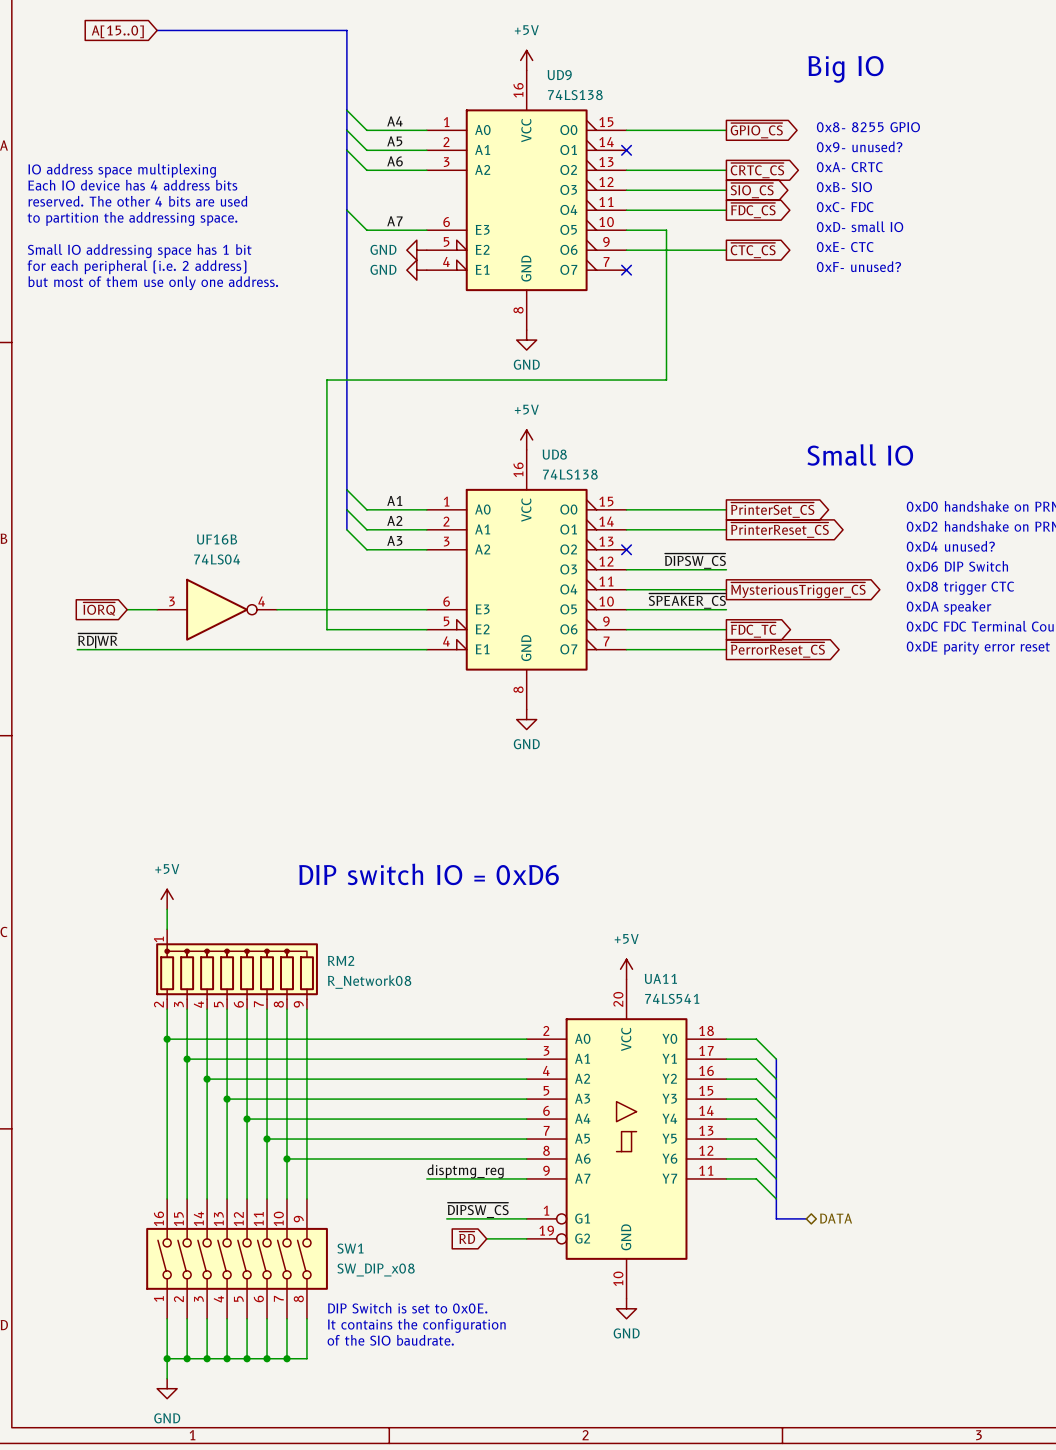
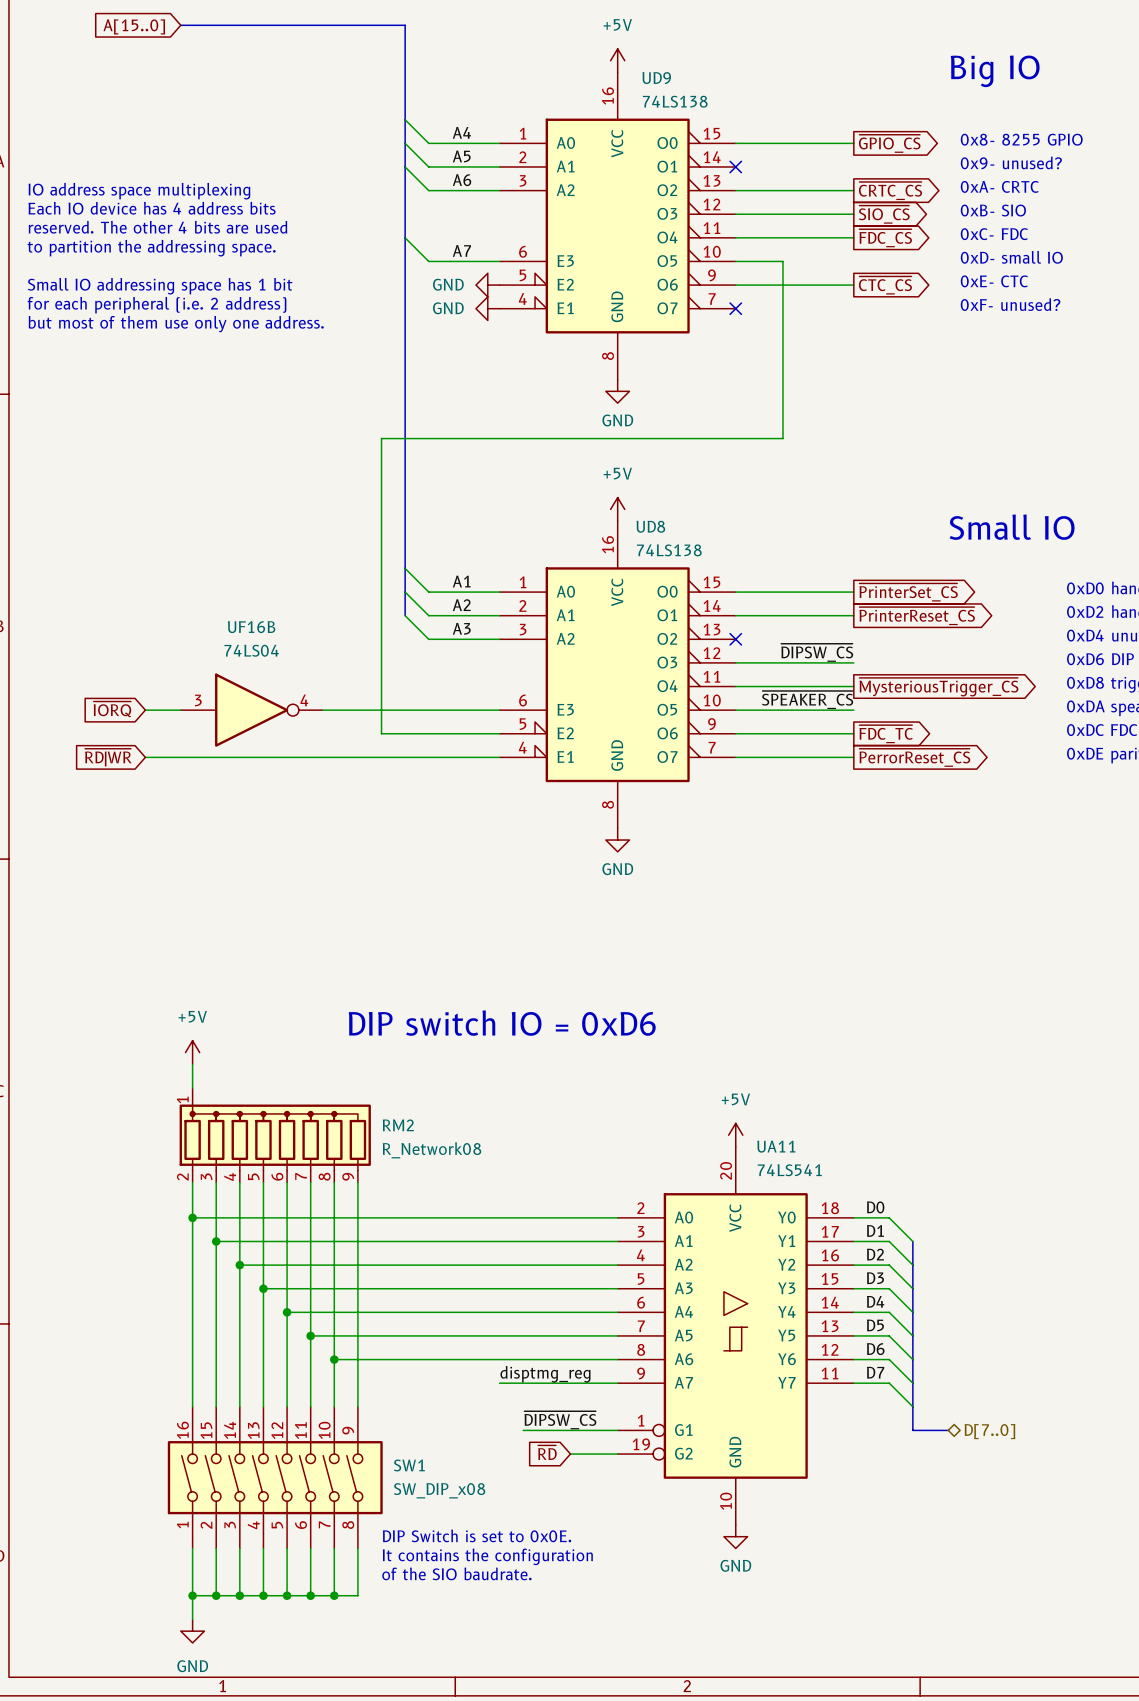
label: ~{RD|WR} (97, 640) -> none
wire: (77, 649) (127, 649) -> none
global label: none -> ~{RD|WR} (108, 757)
label: none -> D0 (875, 1207)
label: none -> D1 (875, 1230)
label: none -> D2 (875, 1254)
label: none -> D3 (875, 1278)
label: none -> D4 (875, 1301)
label: none -> D5 (875, 1325)
label: none -> D6 (875, 1349)
label: none -> D7 (875, 1372)
hierarchical label: DATA (836, 1218) -> D[7..0] (989, 1431)

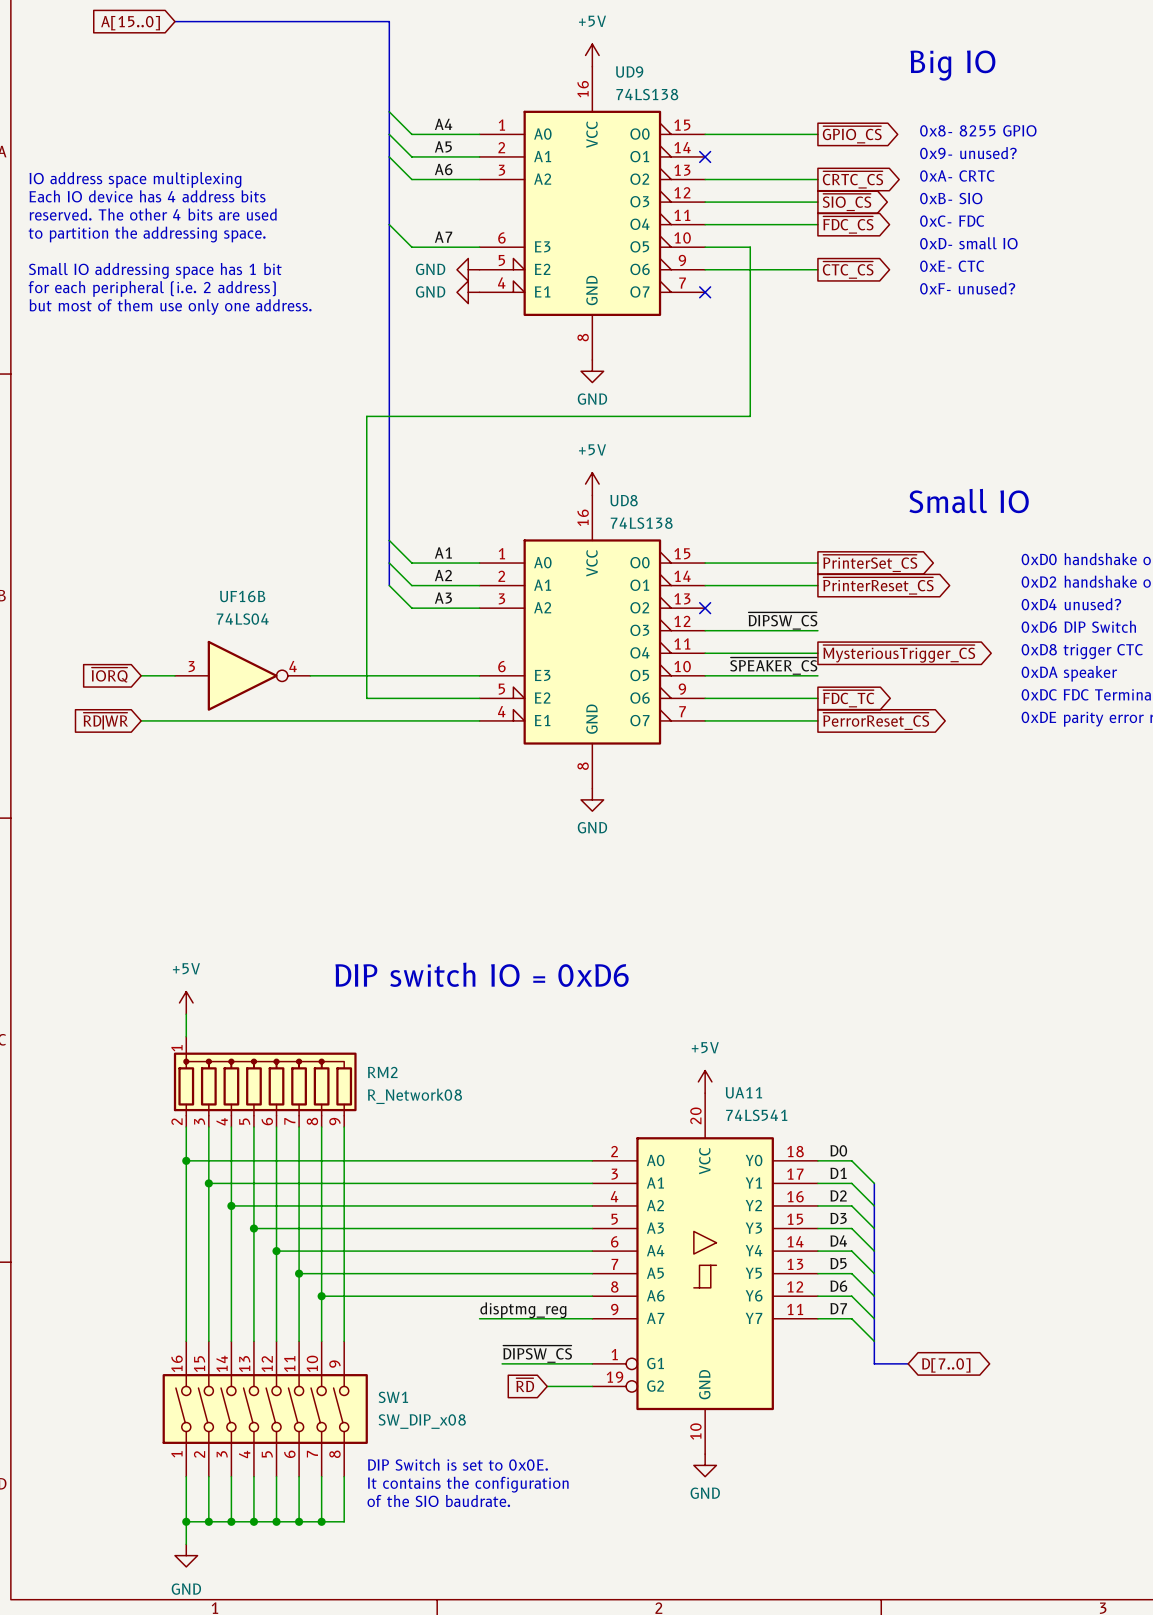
hierarchical label: D[7..0] (989, 1431) -> none
global label: none -> D[7..0] (946, 1365)

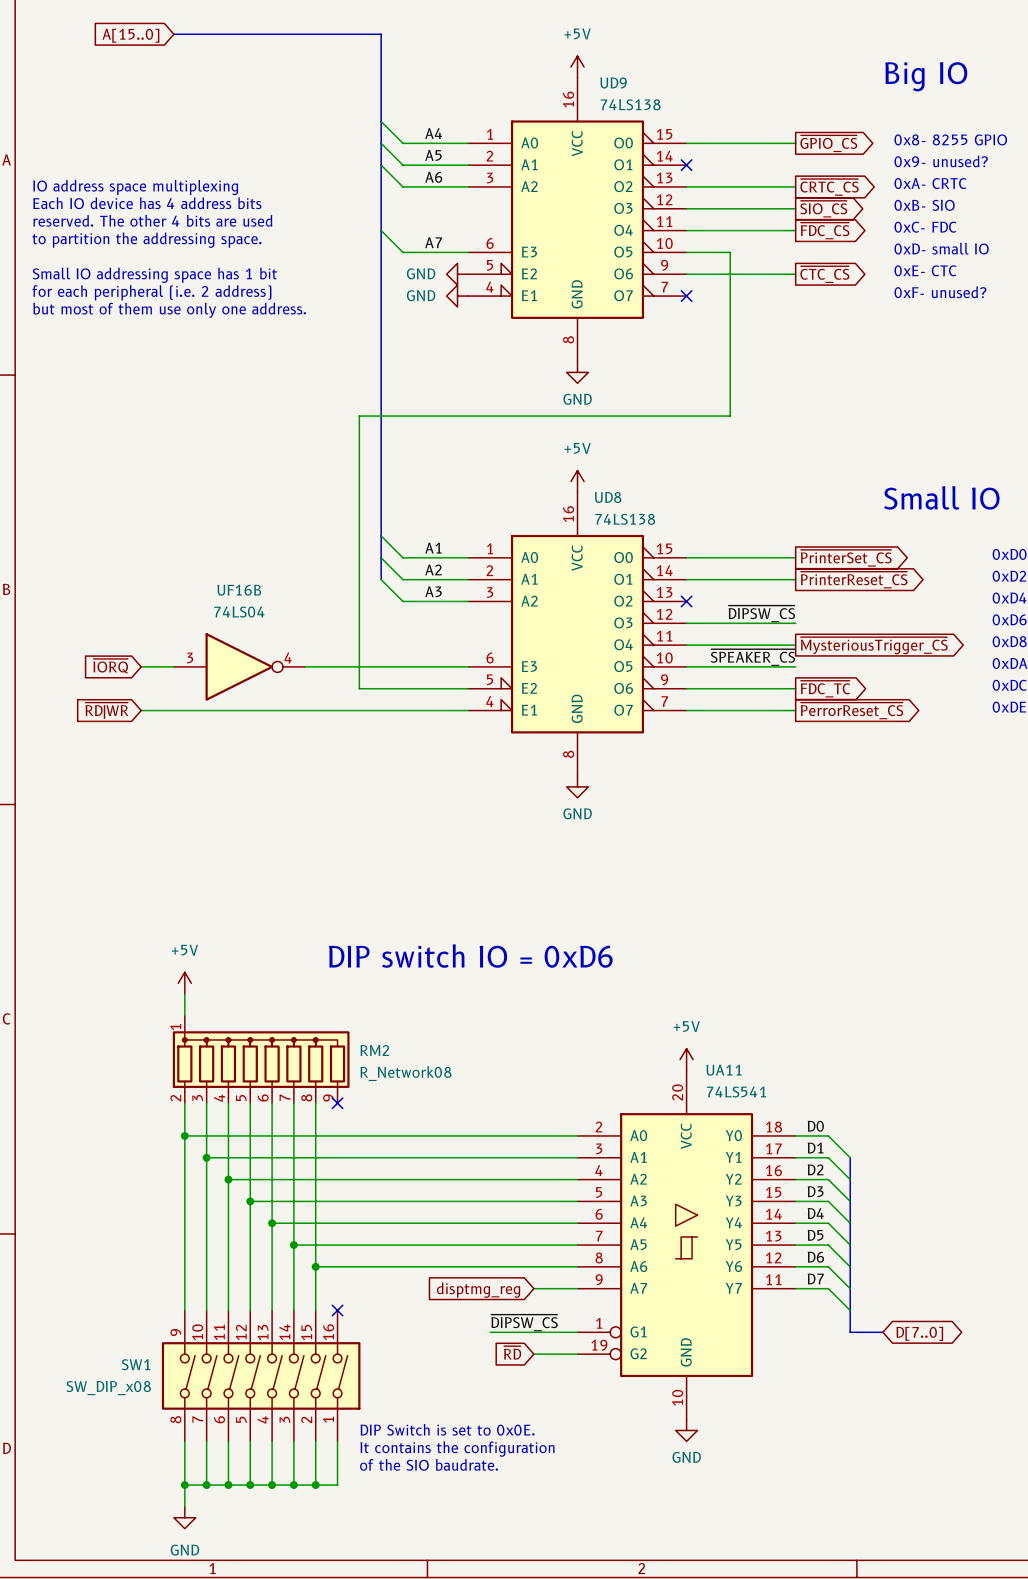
wire: (344, 1127) (344, 1341) -> none
no-connect mark: none -> (337, 1103)
label: disptmg_reg (523, 1310) -> none
wire: (479, 1318) (547, 1318) -> none
global label: none -> disptmg_reg (478, 1290)
no-connect mark: none -> (337, 1310)
SW1 flip: as is (265, 1409) -> left-right (261, 1375)

